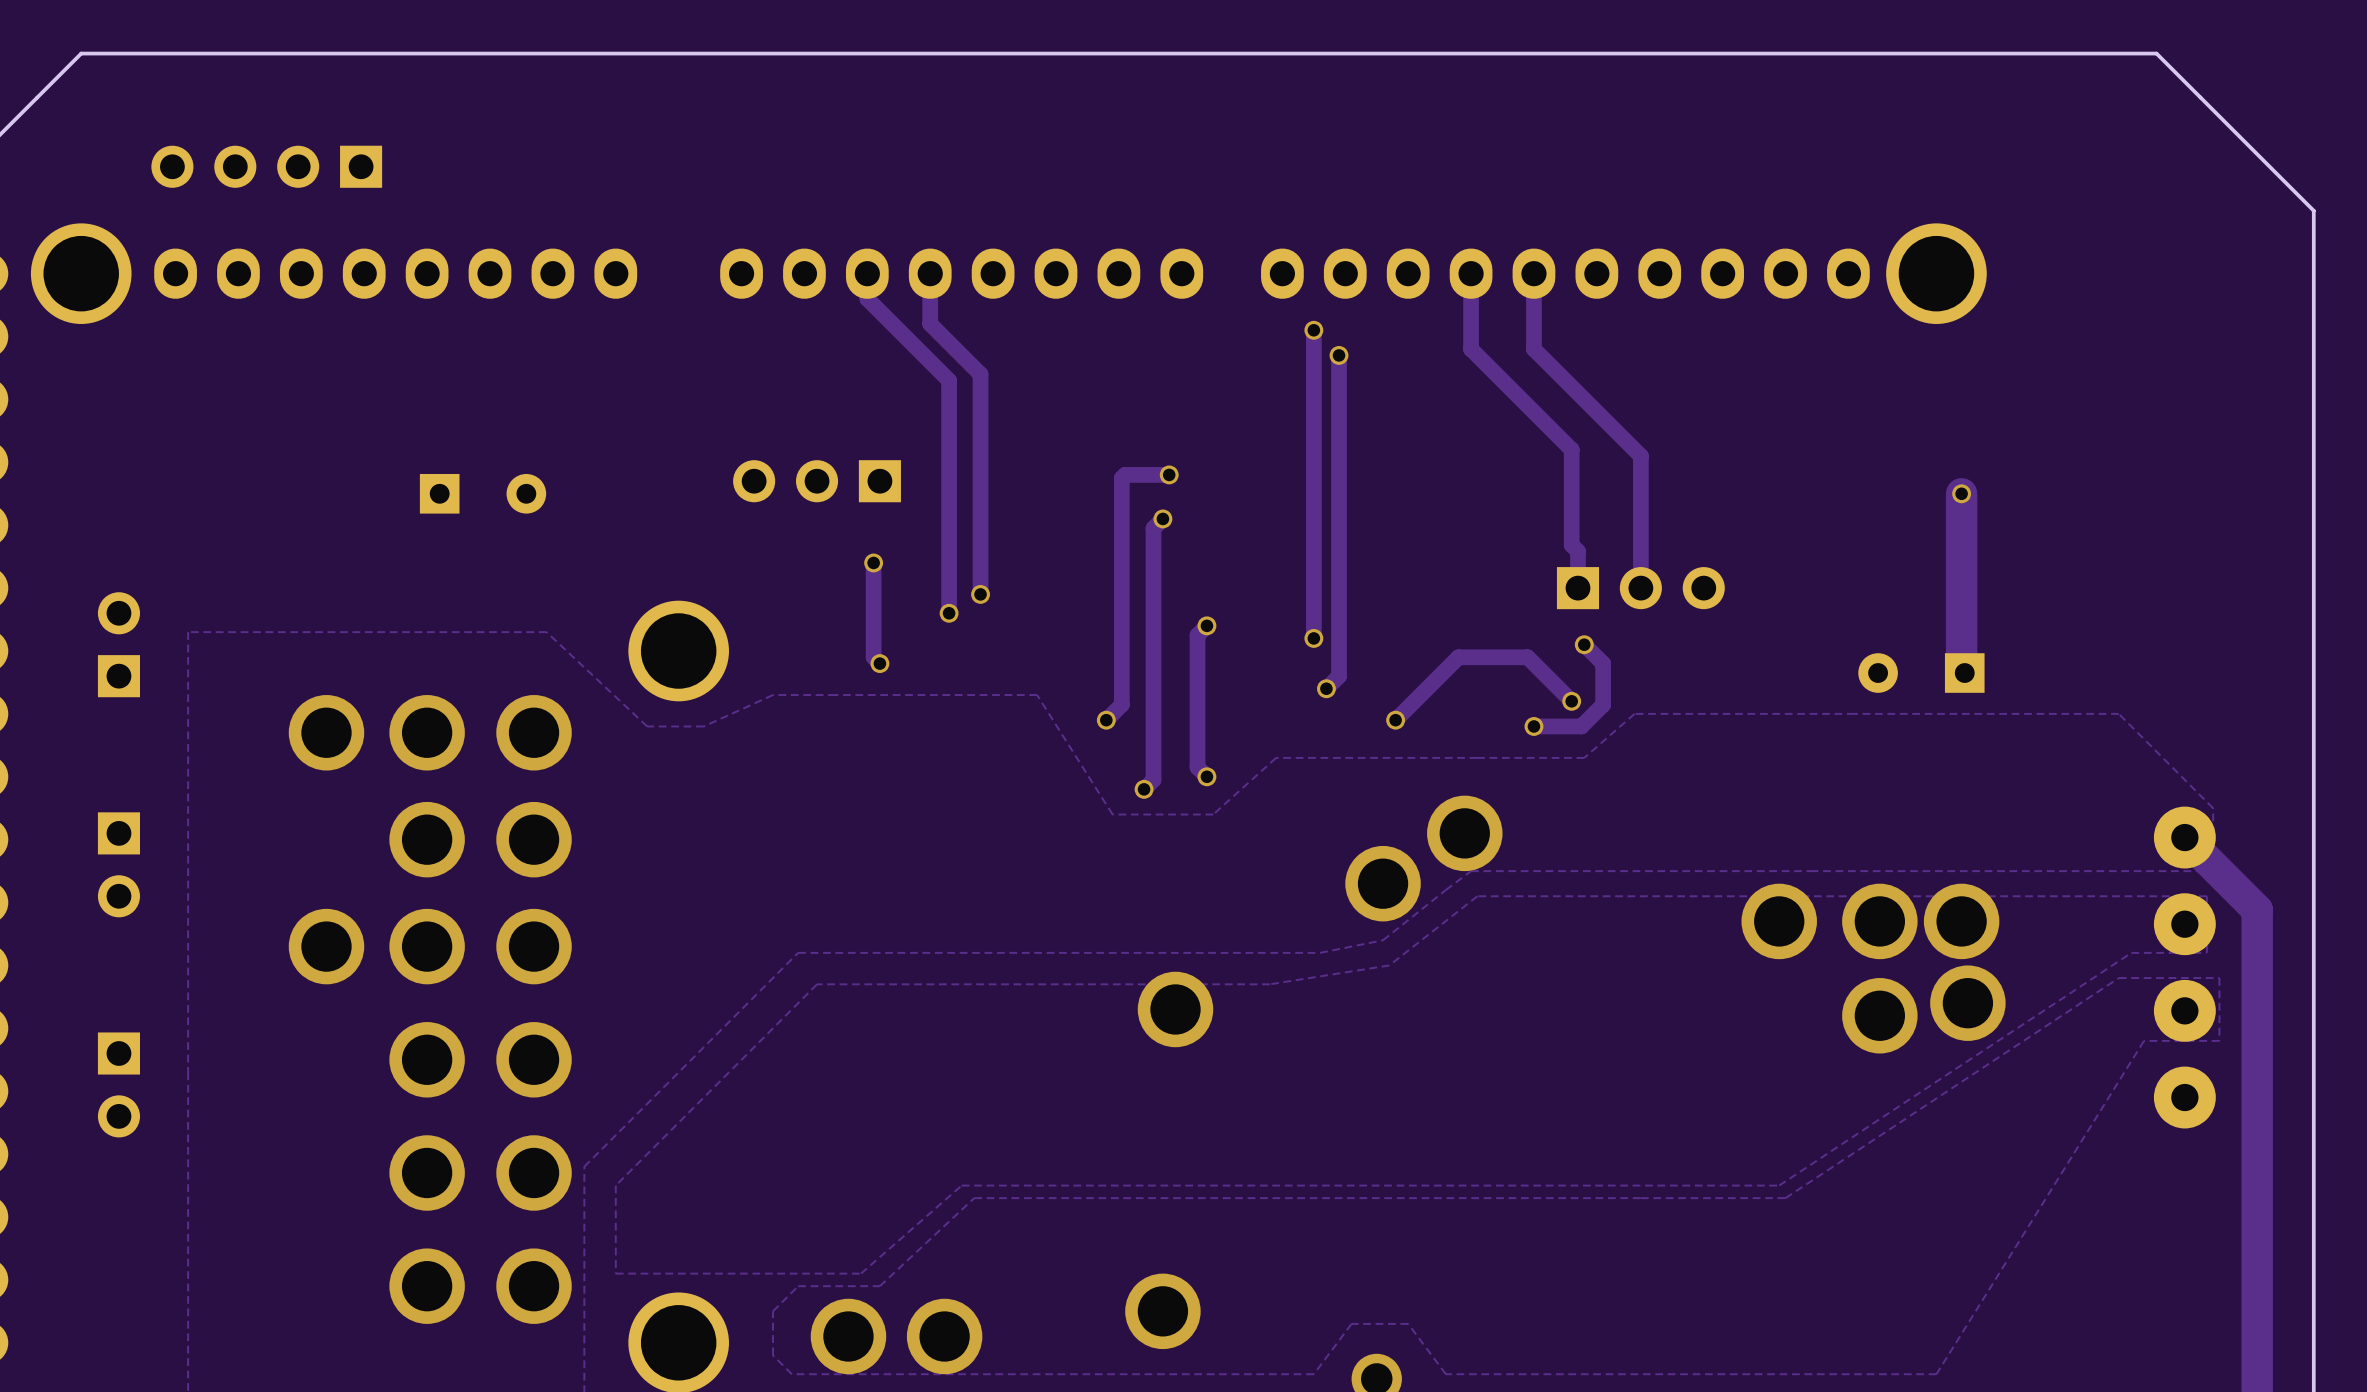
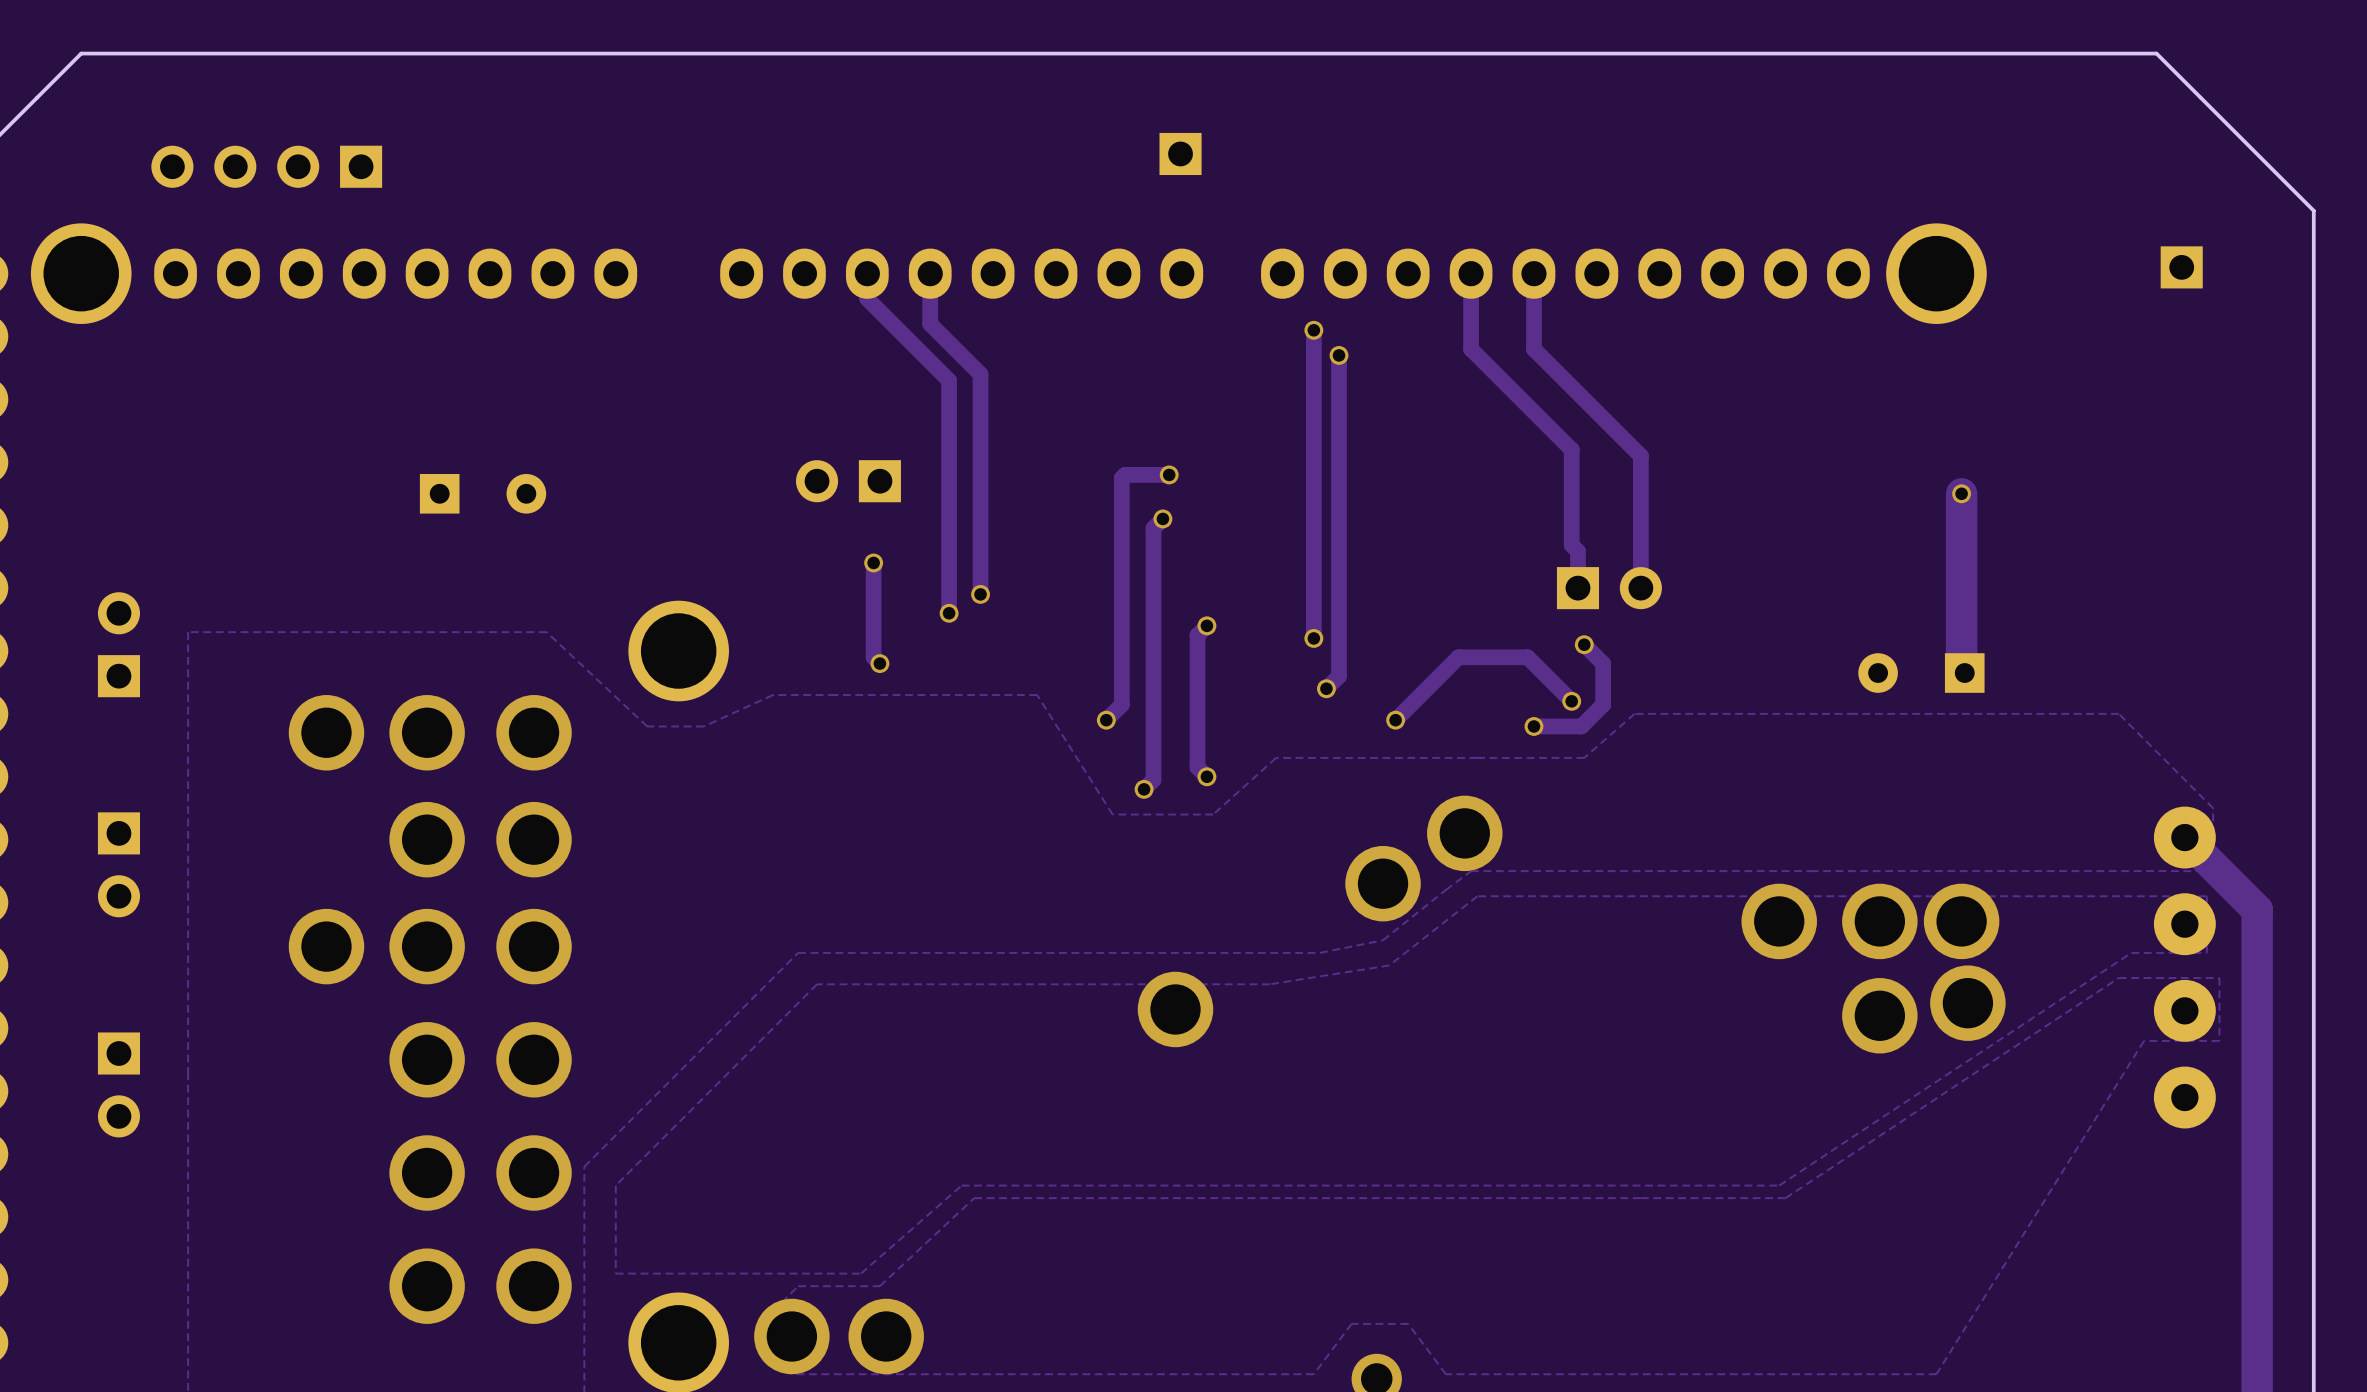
part: none -> (1180, 153)
part: none -> (2181, 267)
part: (817, 481) -> none
part: (1640, 588) -> none
via: (1162, 1311) -> none
via: none -> (791, 1336)
via: (848, 1336) -> none
via: none -> (886, 1336)
via: (944, 1336) -> none

